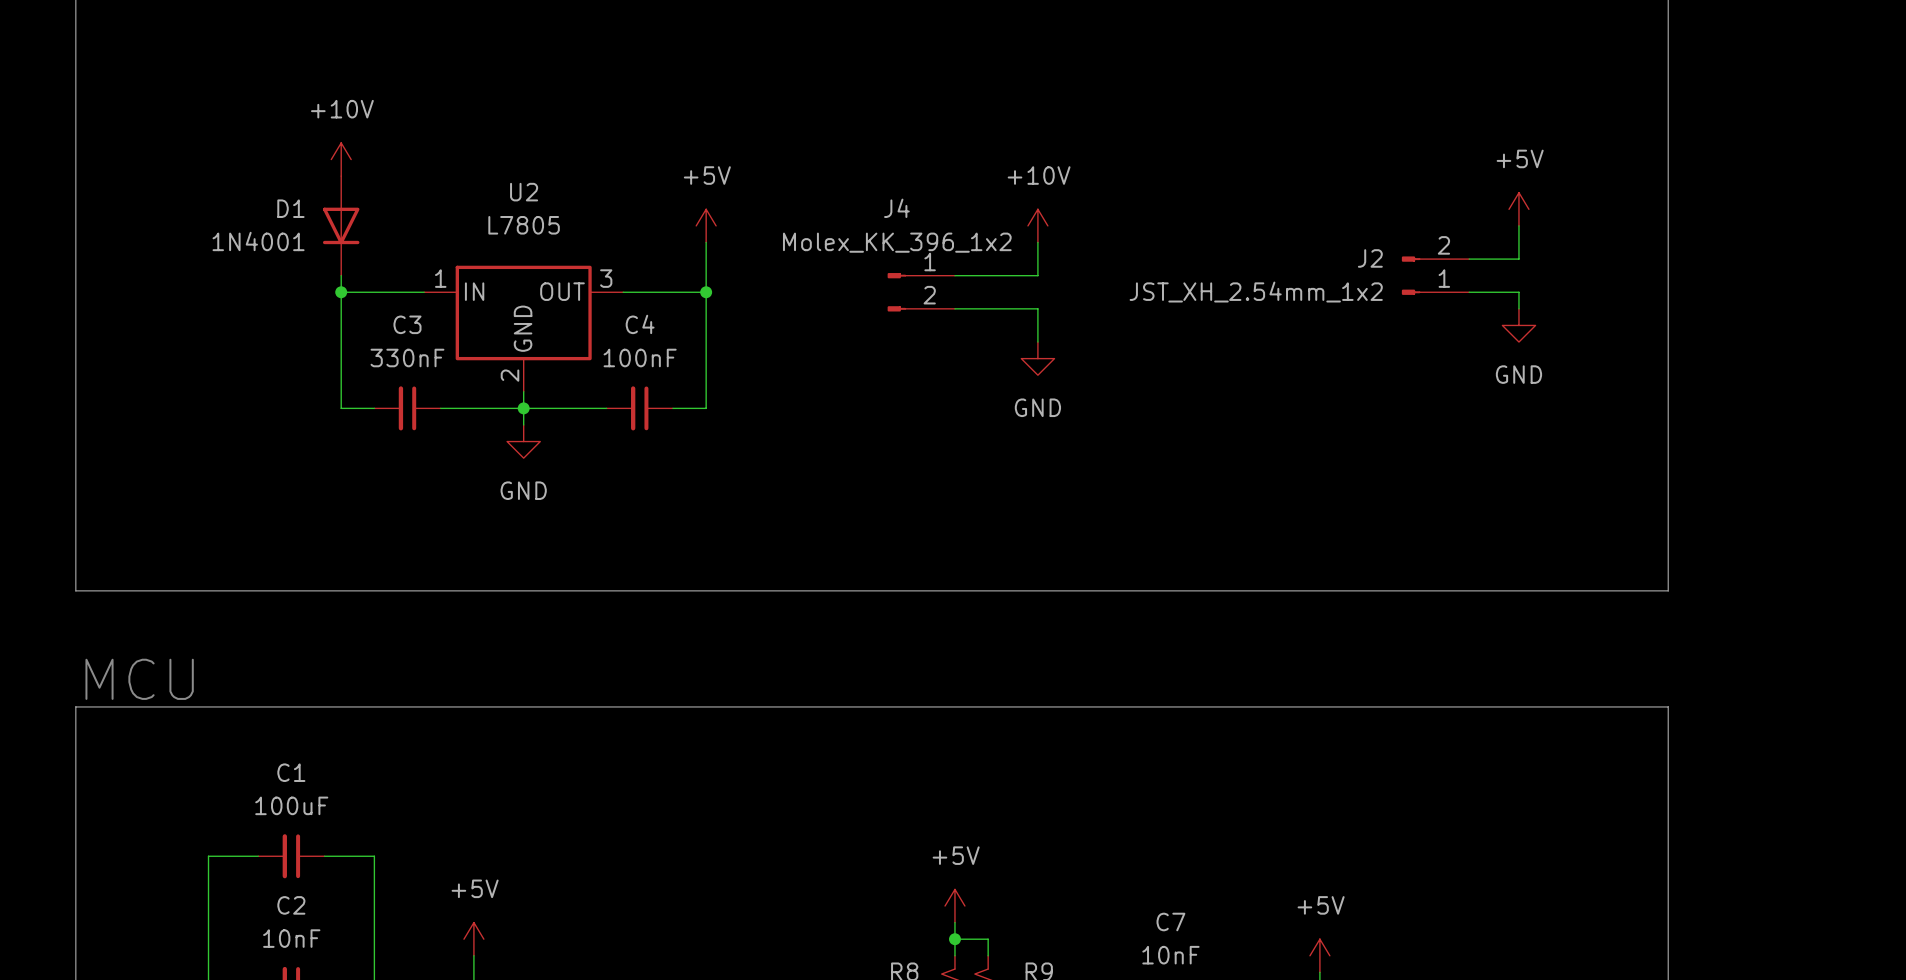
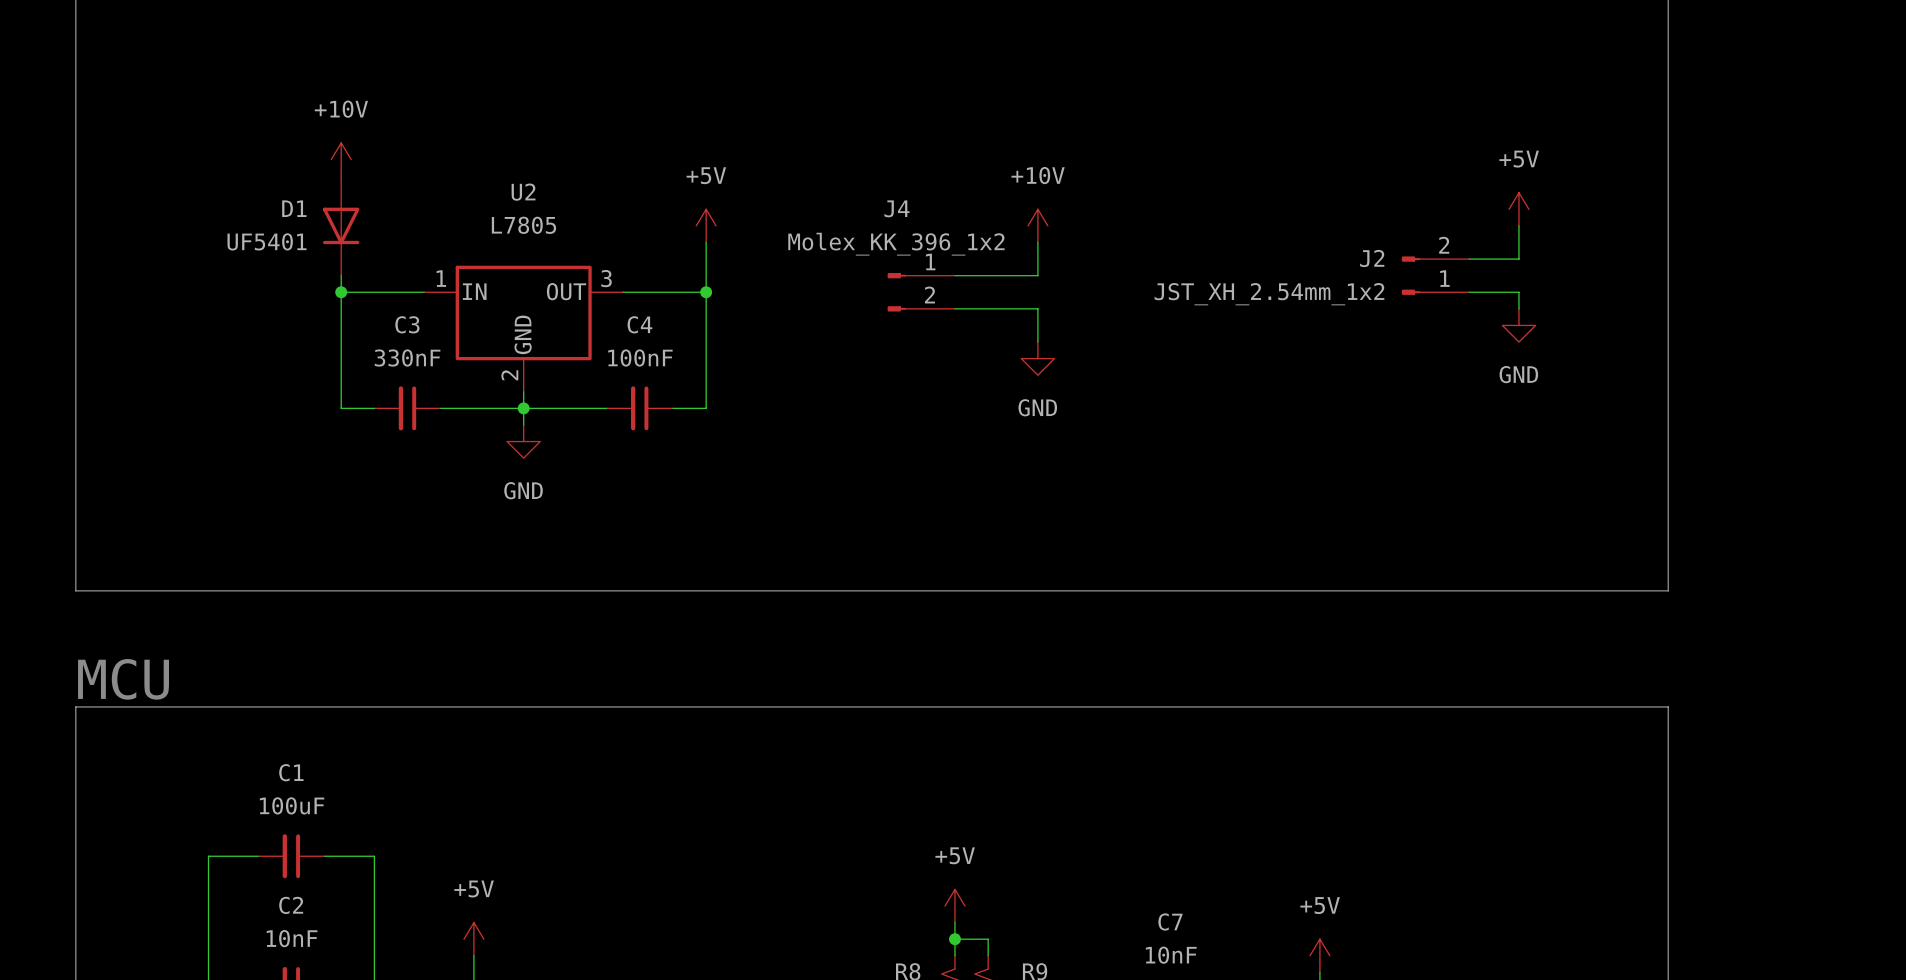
D1 value: 1N4001 (258, 241) -> UF5401 (266, 241)

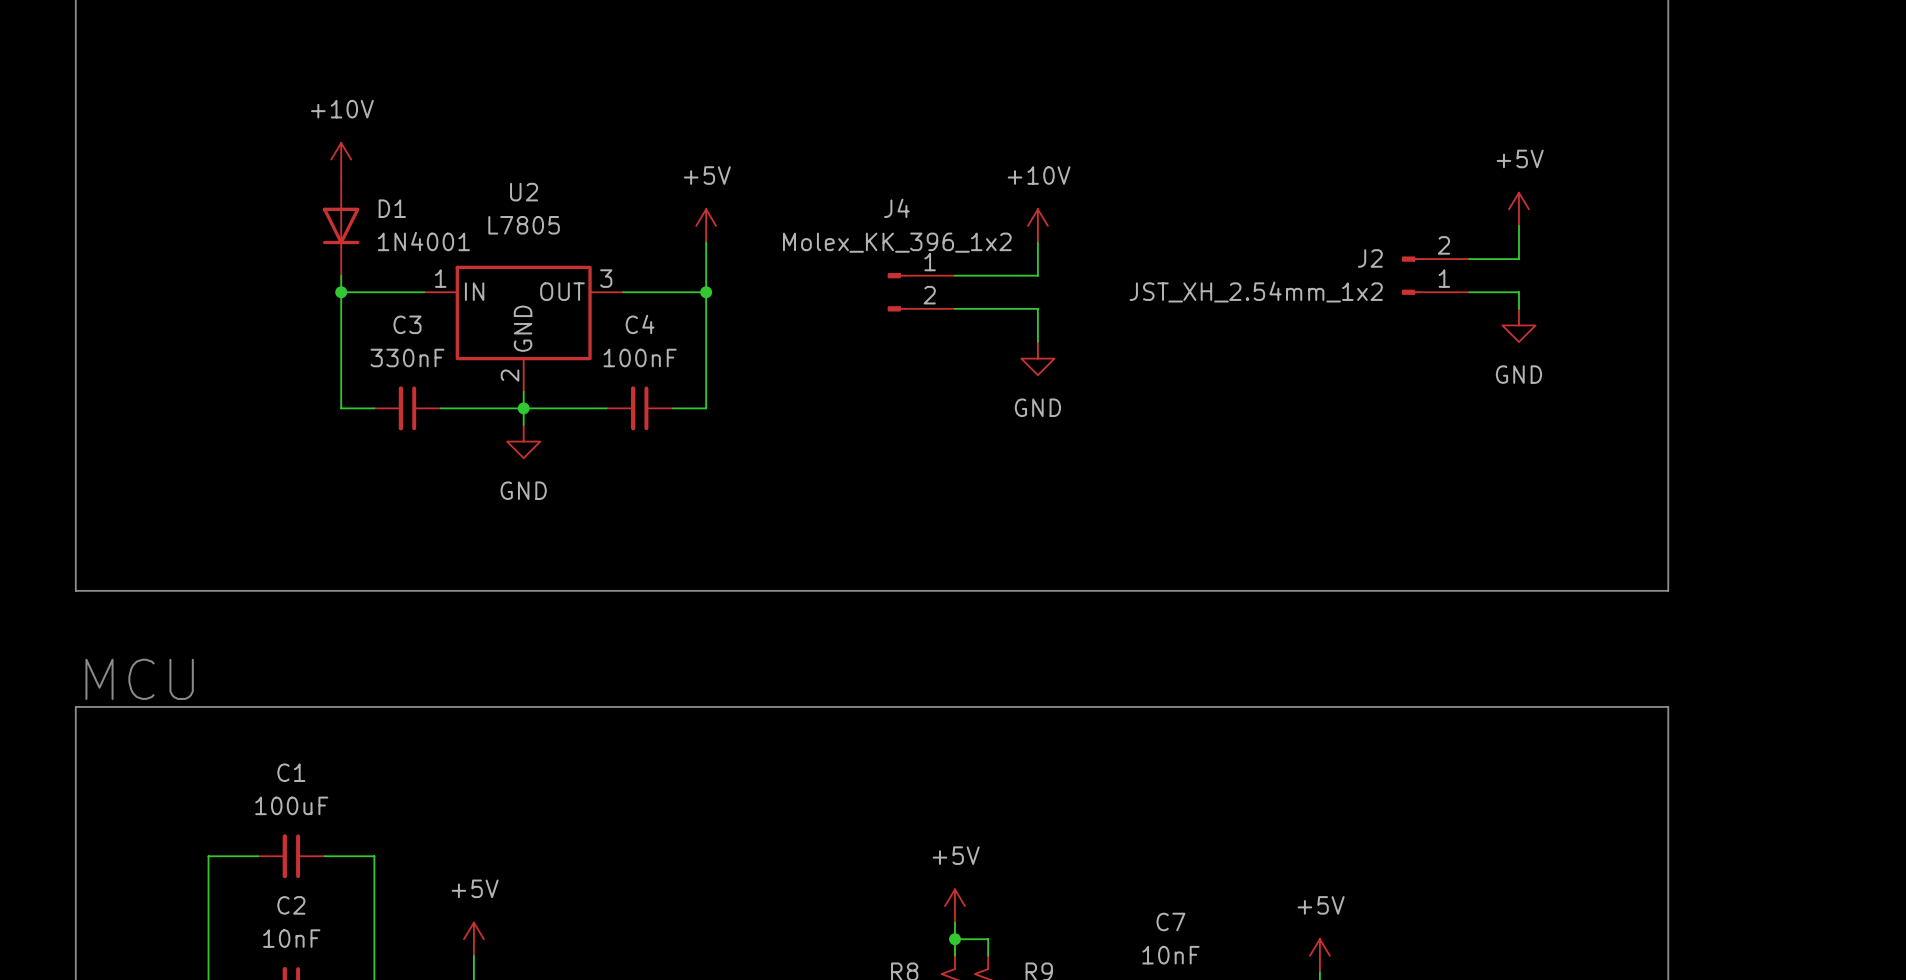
D1 name position: D1 (294, 208) -> D1 (392, 208)
D1 value: UF5401 (266, 241) -> 1N4001 (423, 241)

